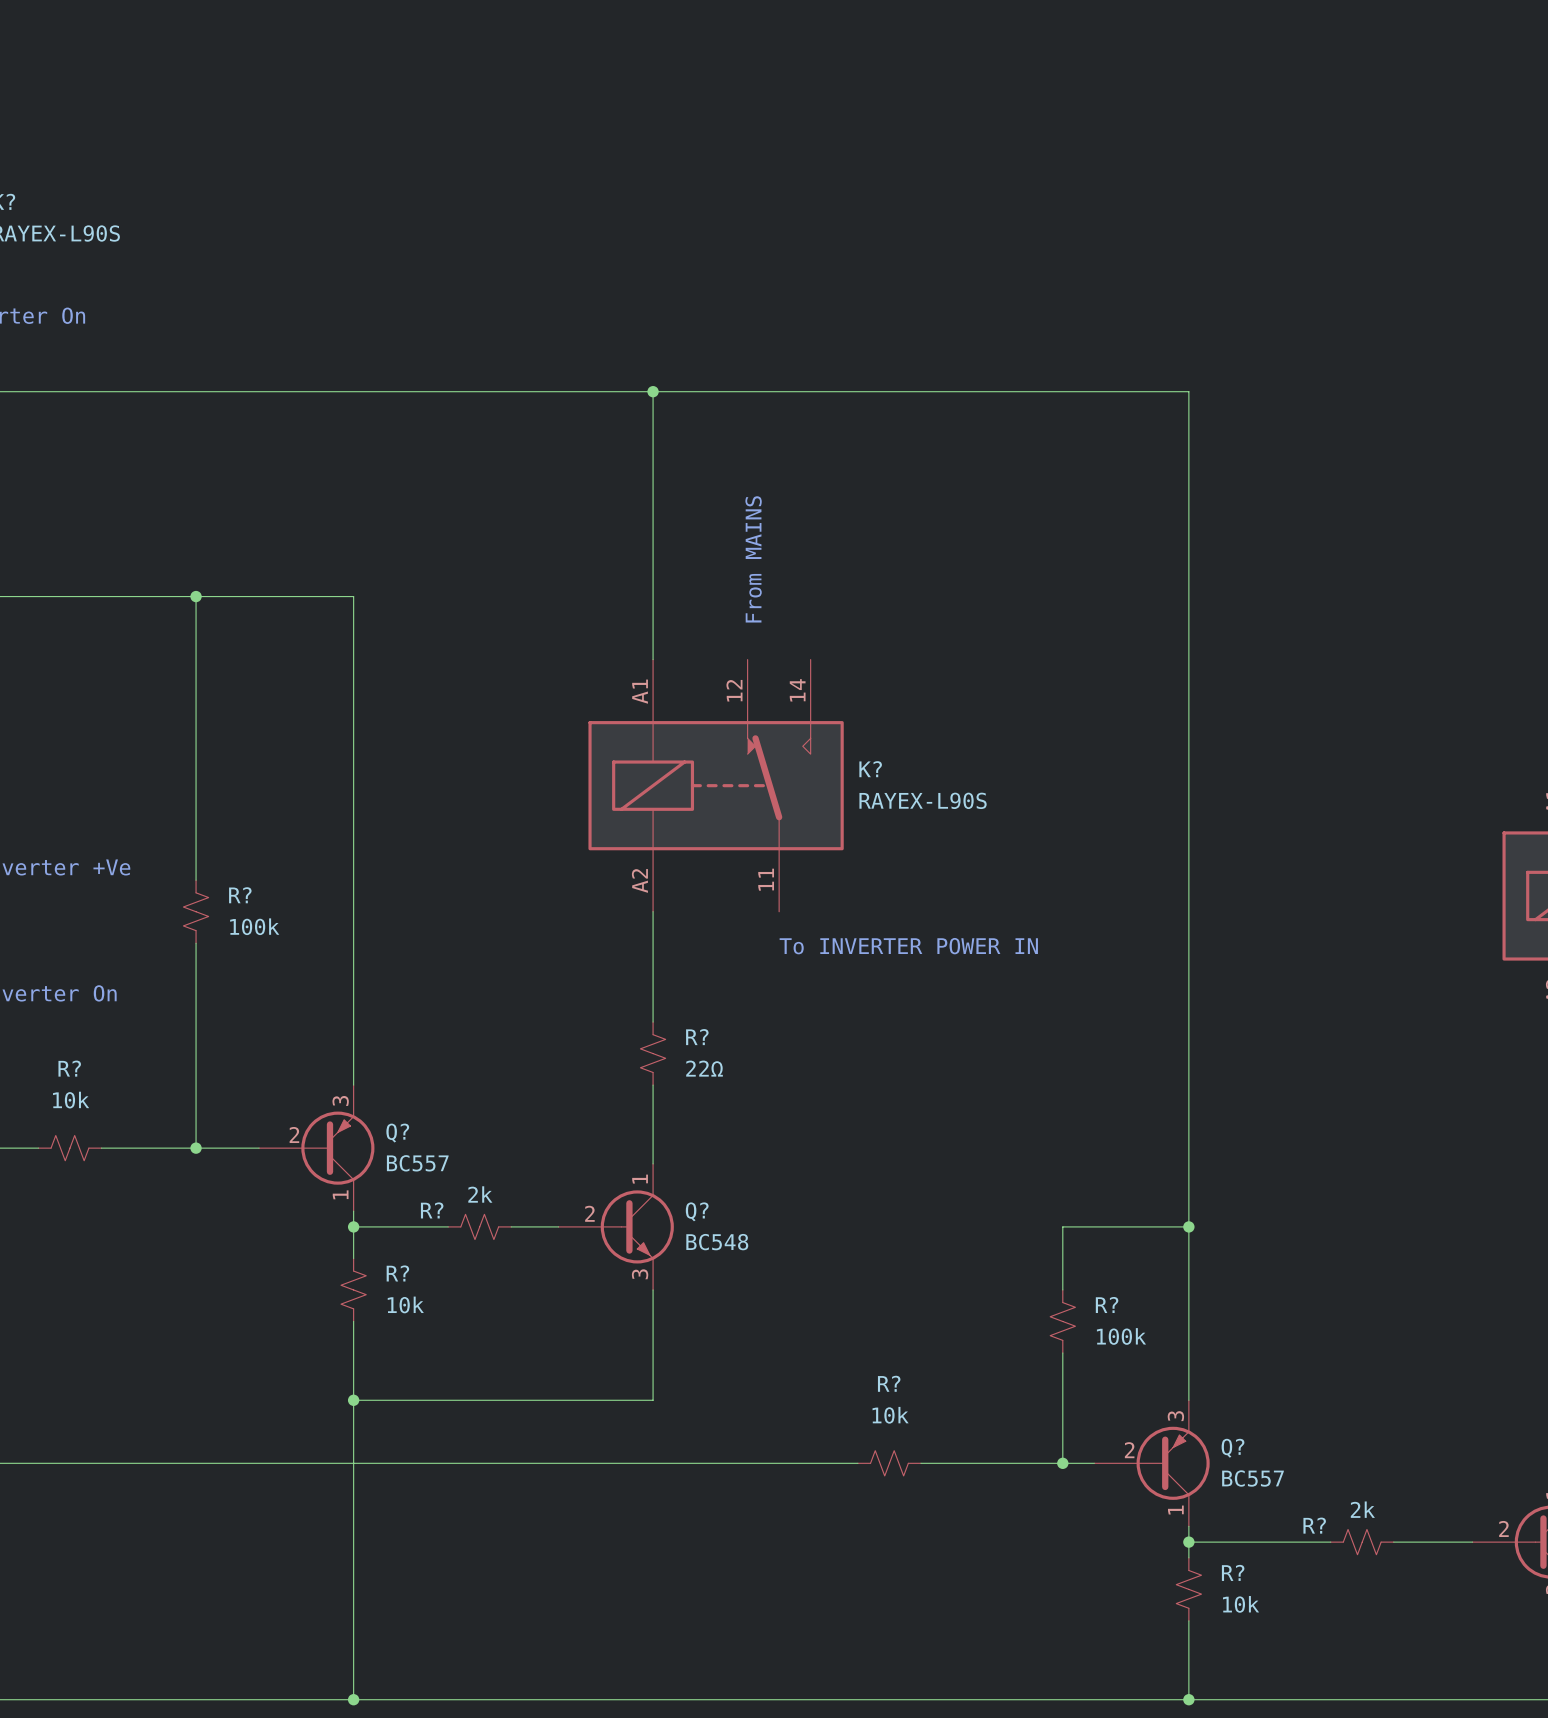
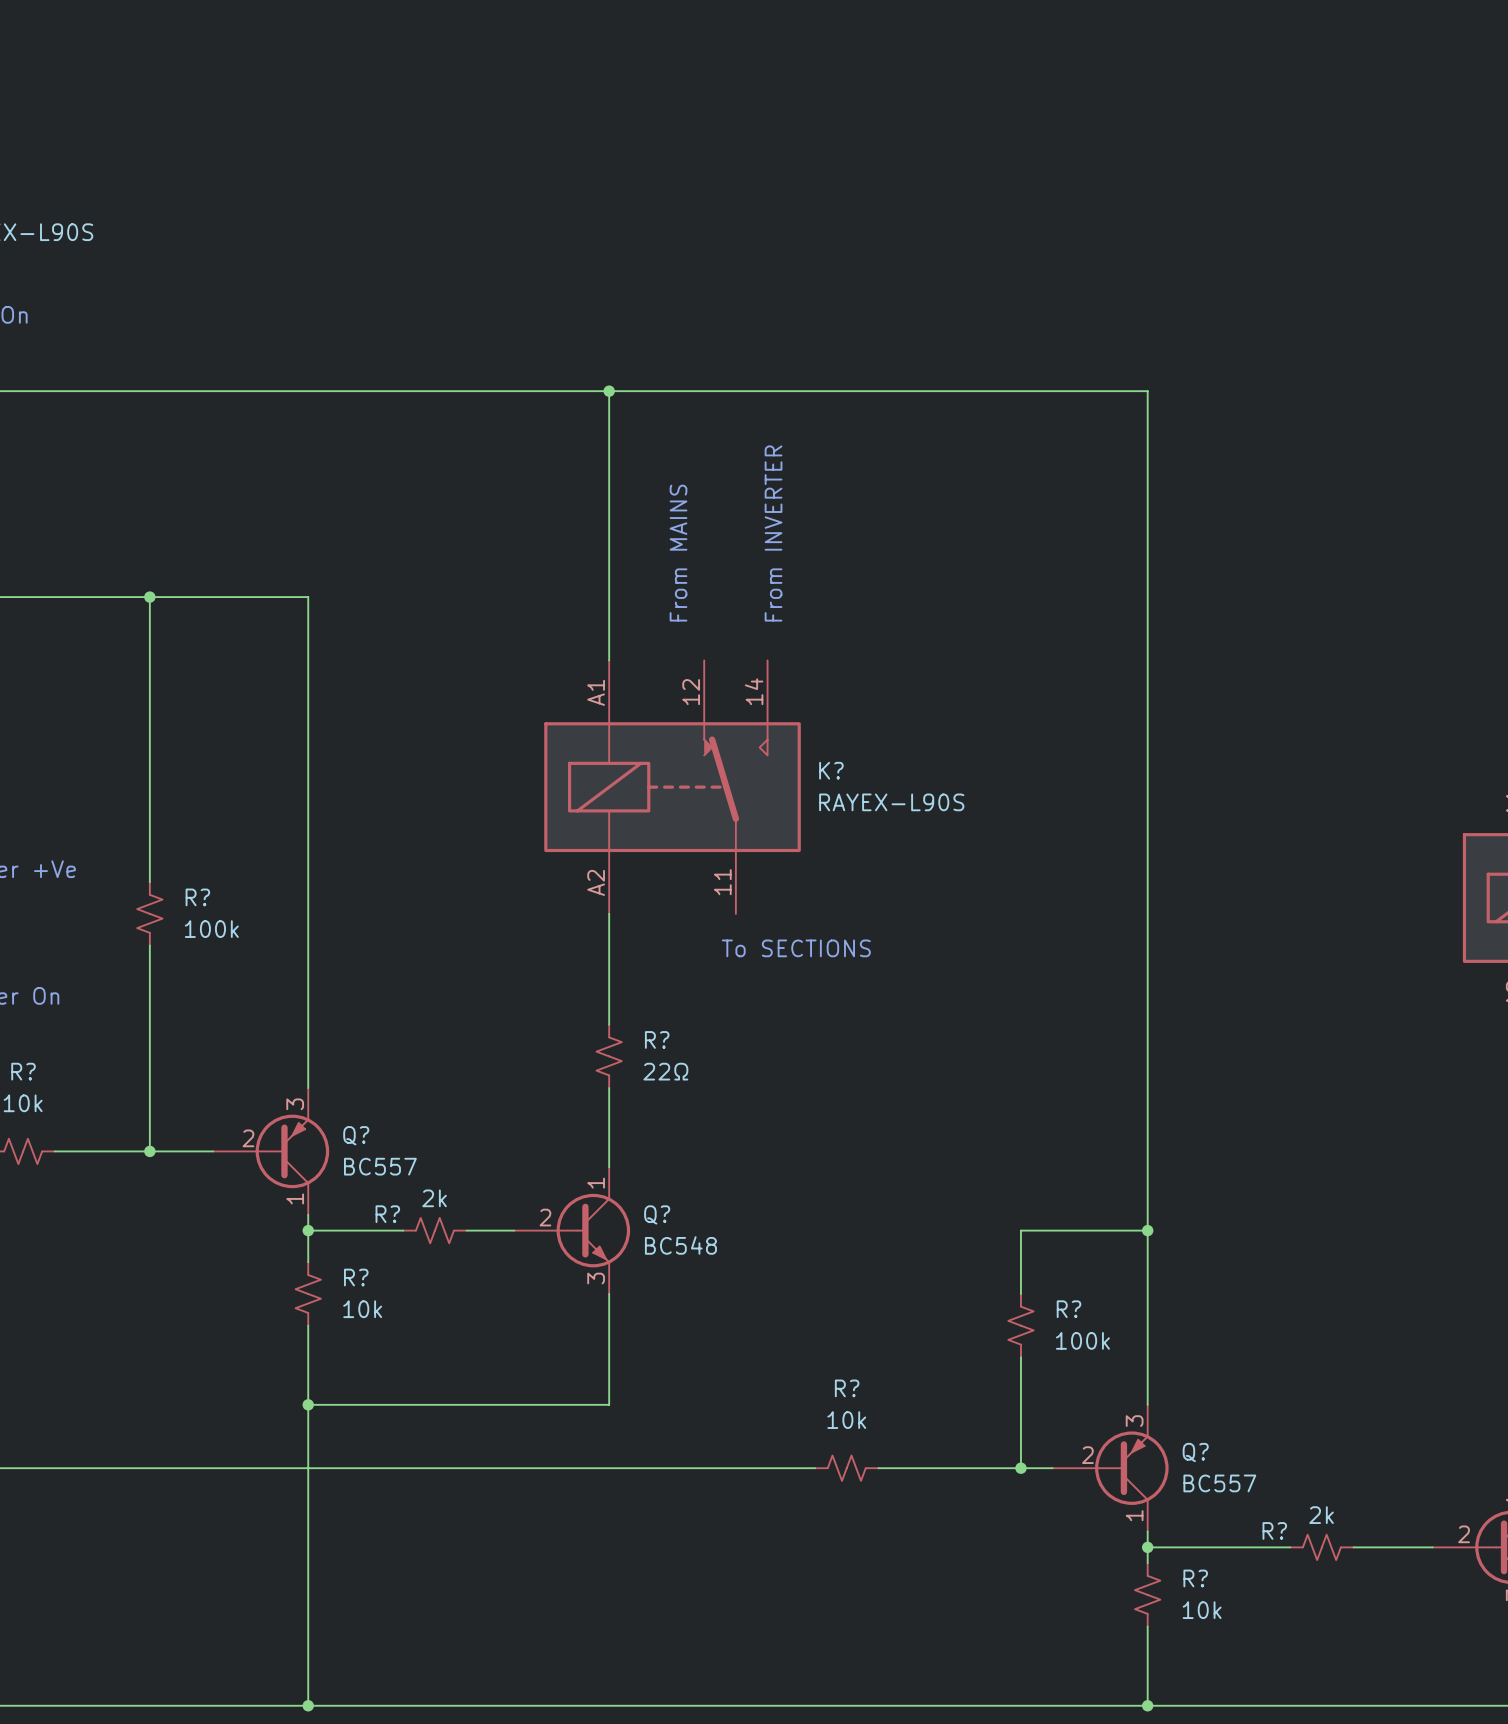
text: none -> From INVERTER (773, 533)
text position: From MAINS (753, 559) -> From MAINS (678, 553)
text: none -> To SECTIONS (796, 948)
text: To INVERTER POWER IN (908, 946) -> none

